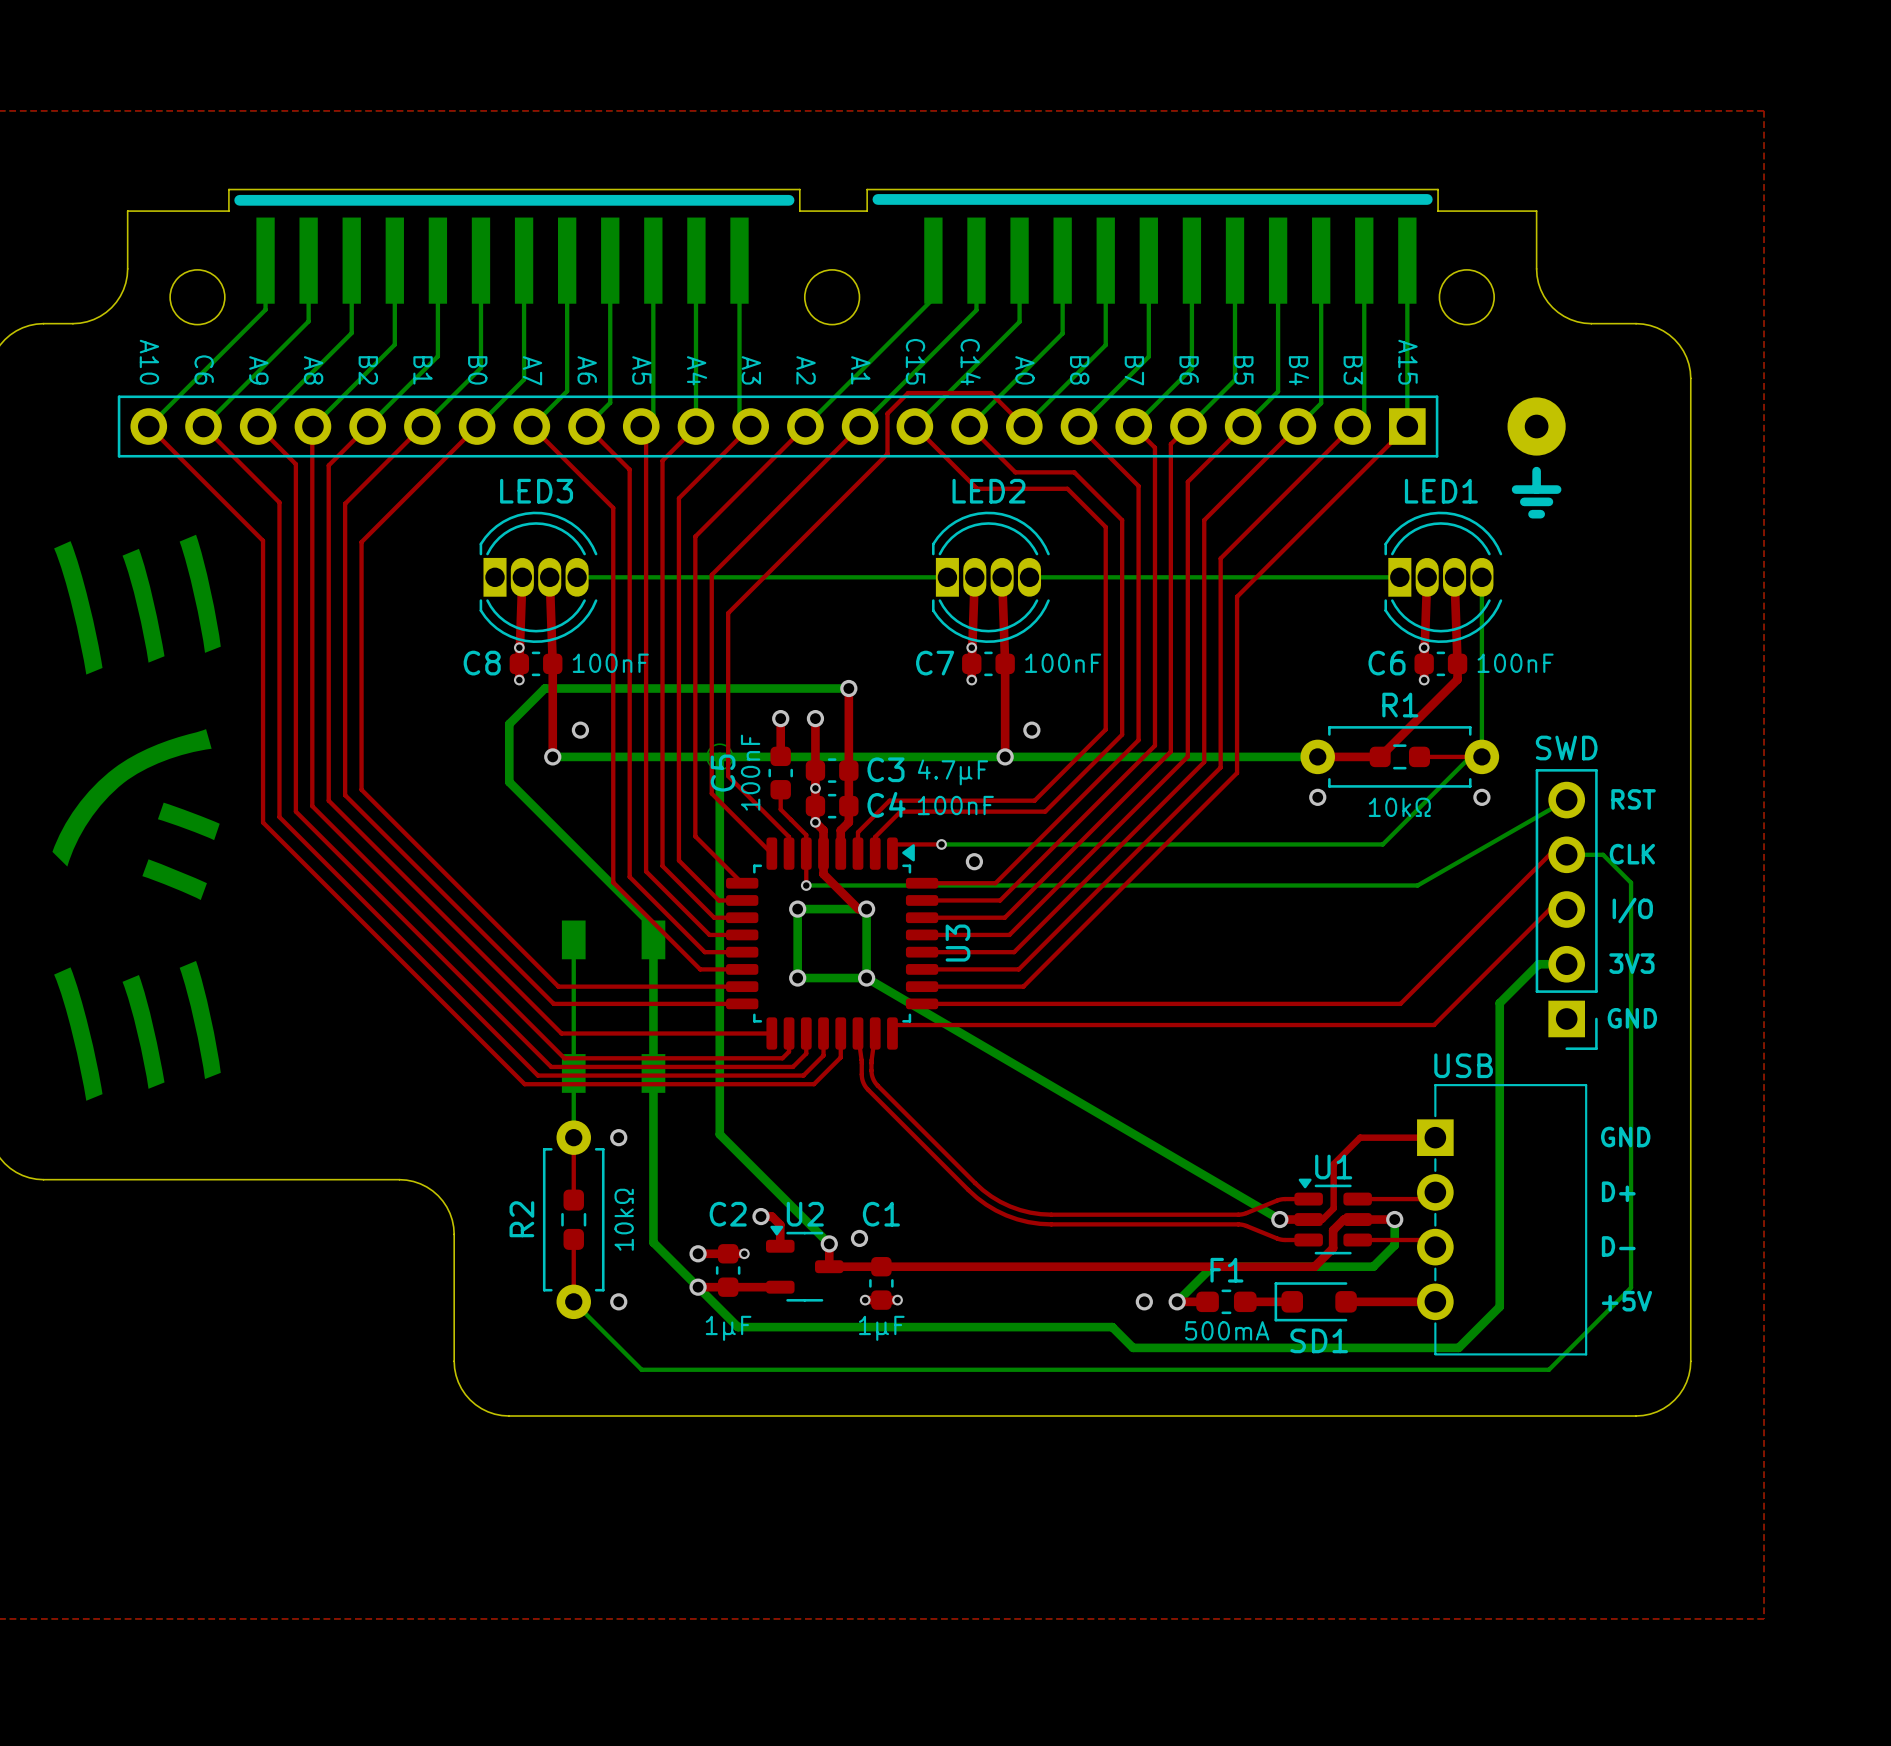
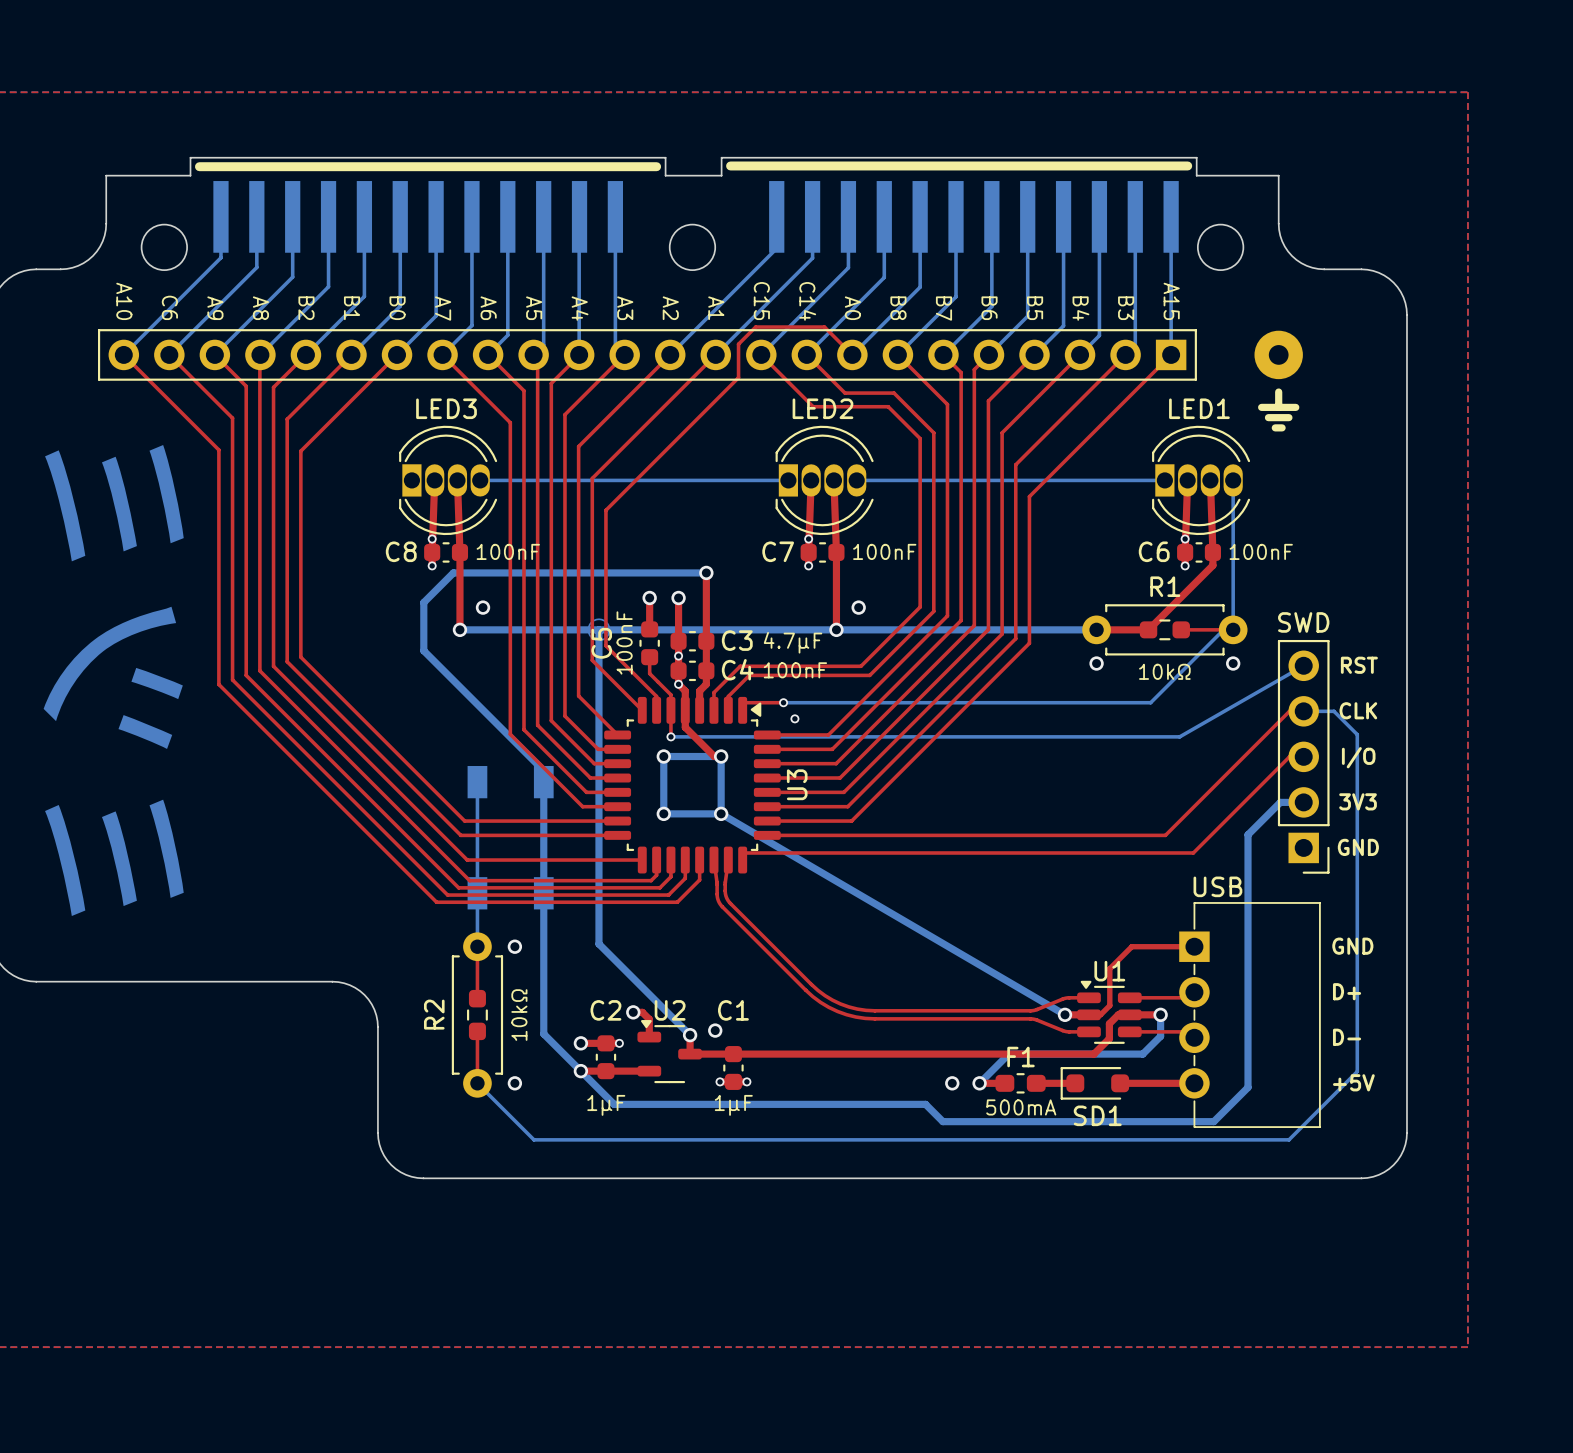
via: (974, 861) -> none
via: none -> (794, 718)

